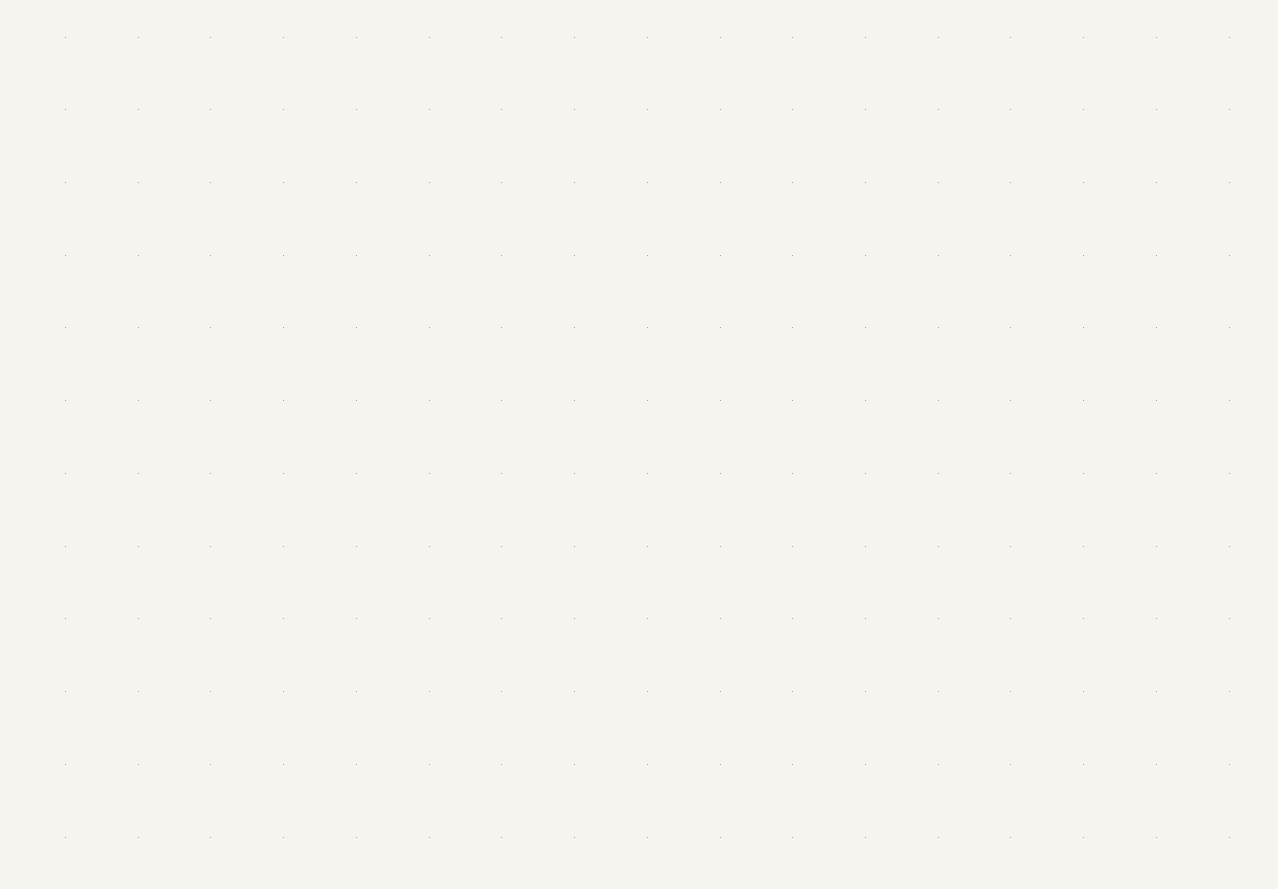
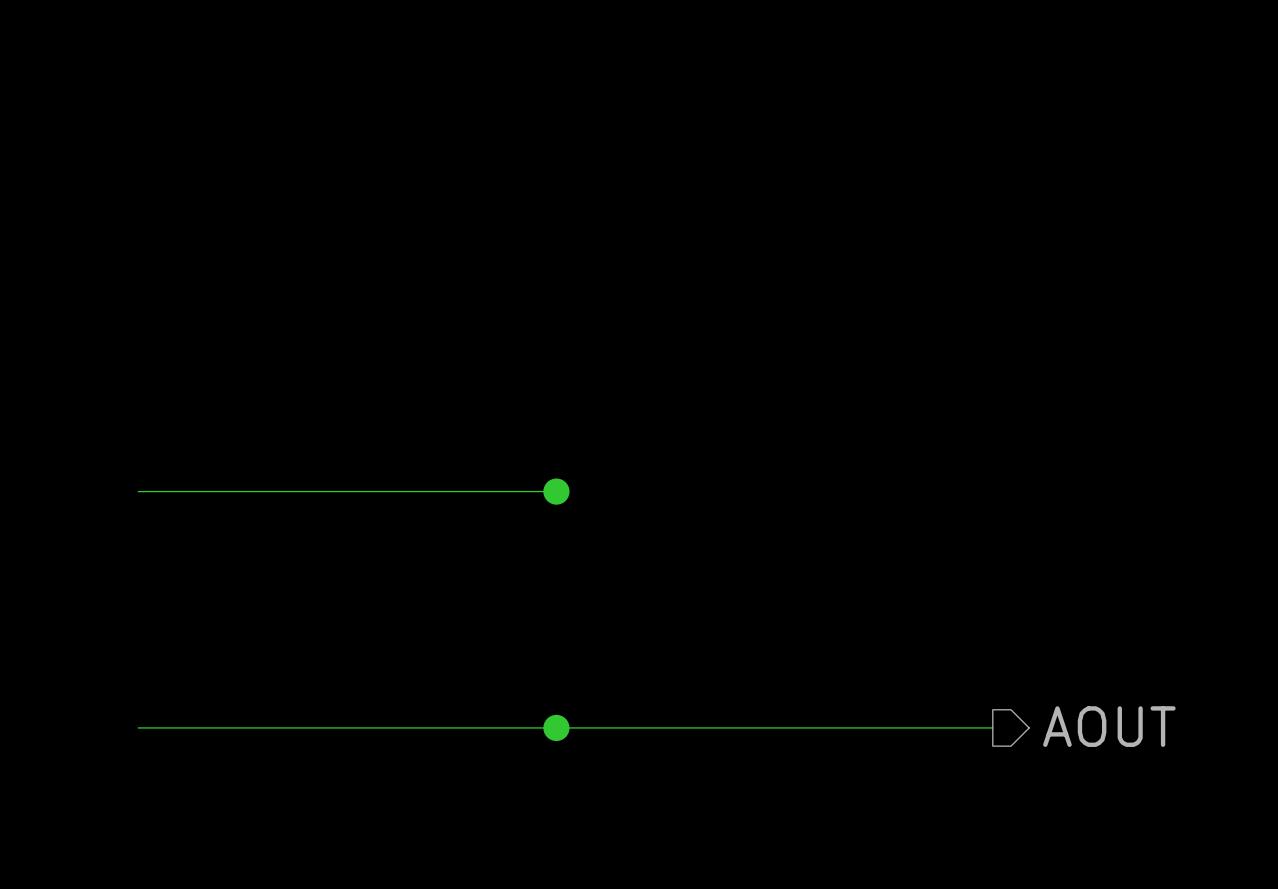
wire: none -> (138, 491) (556, 491)
junction: none -> (556, 491)
hierarchical label: none -> AOUT (1109, 726)
wire: none -> (138, 727) (992, 727)
junction: none -> (556, 727)

